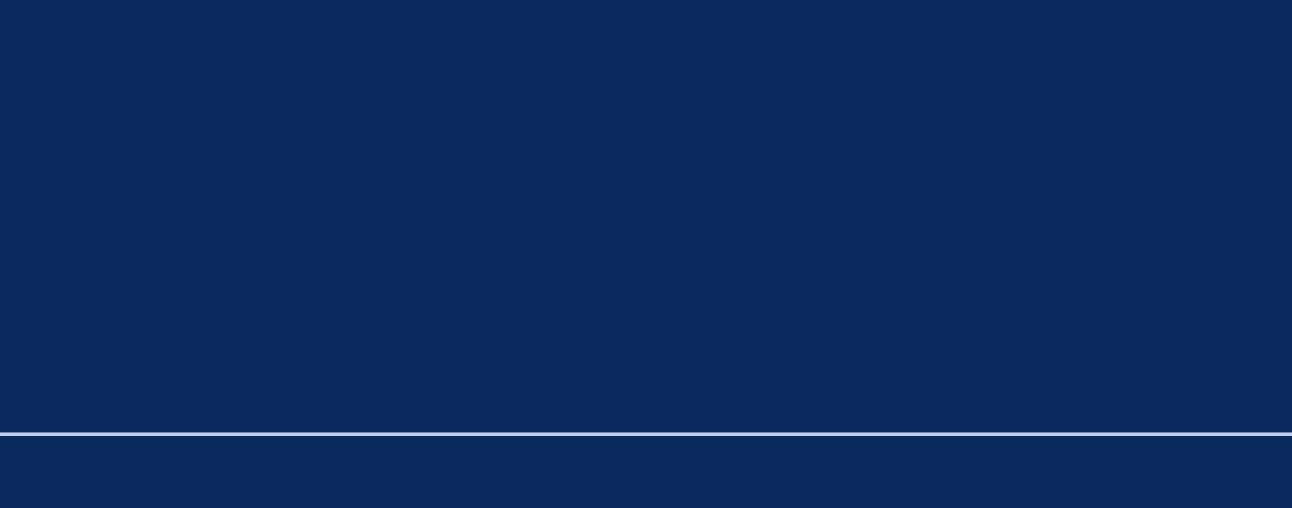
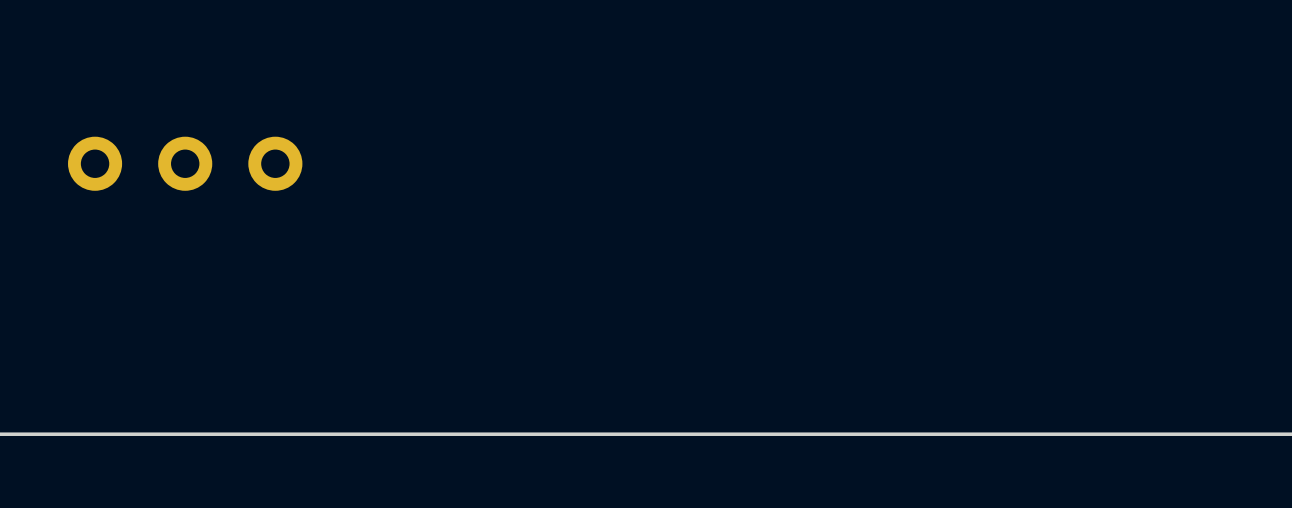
part: none -> (185, 163)

